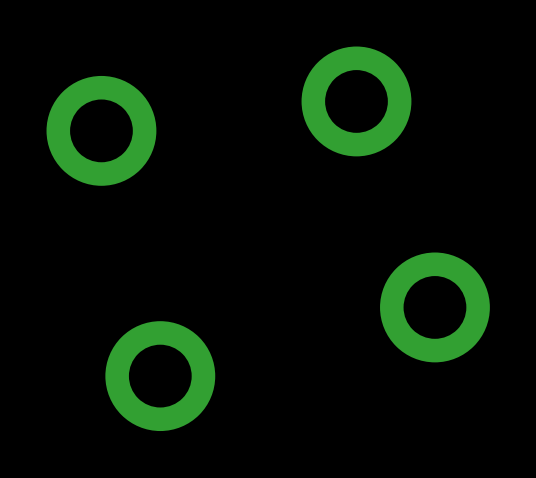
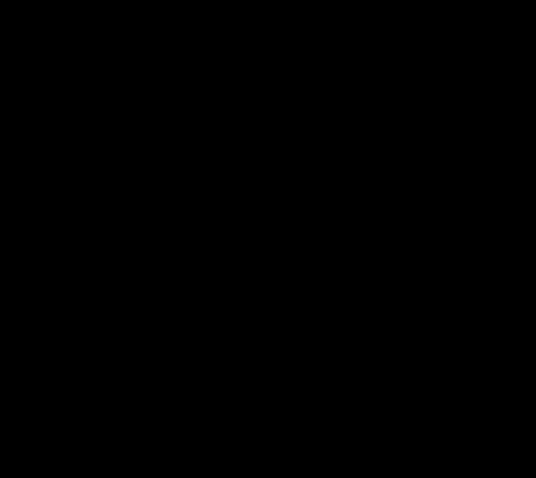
part: (356, 101) -> none
part: (101, 130) -> none
part: (434, 307) -> none
part: (160, 376) -> none

